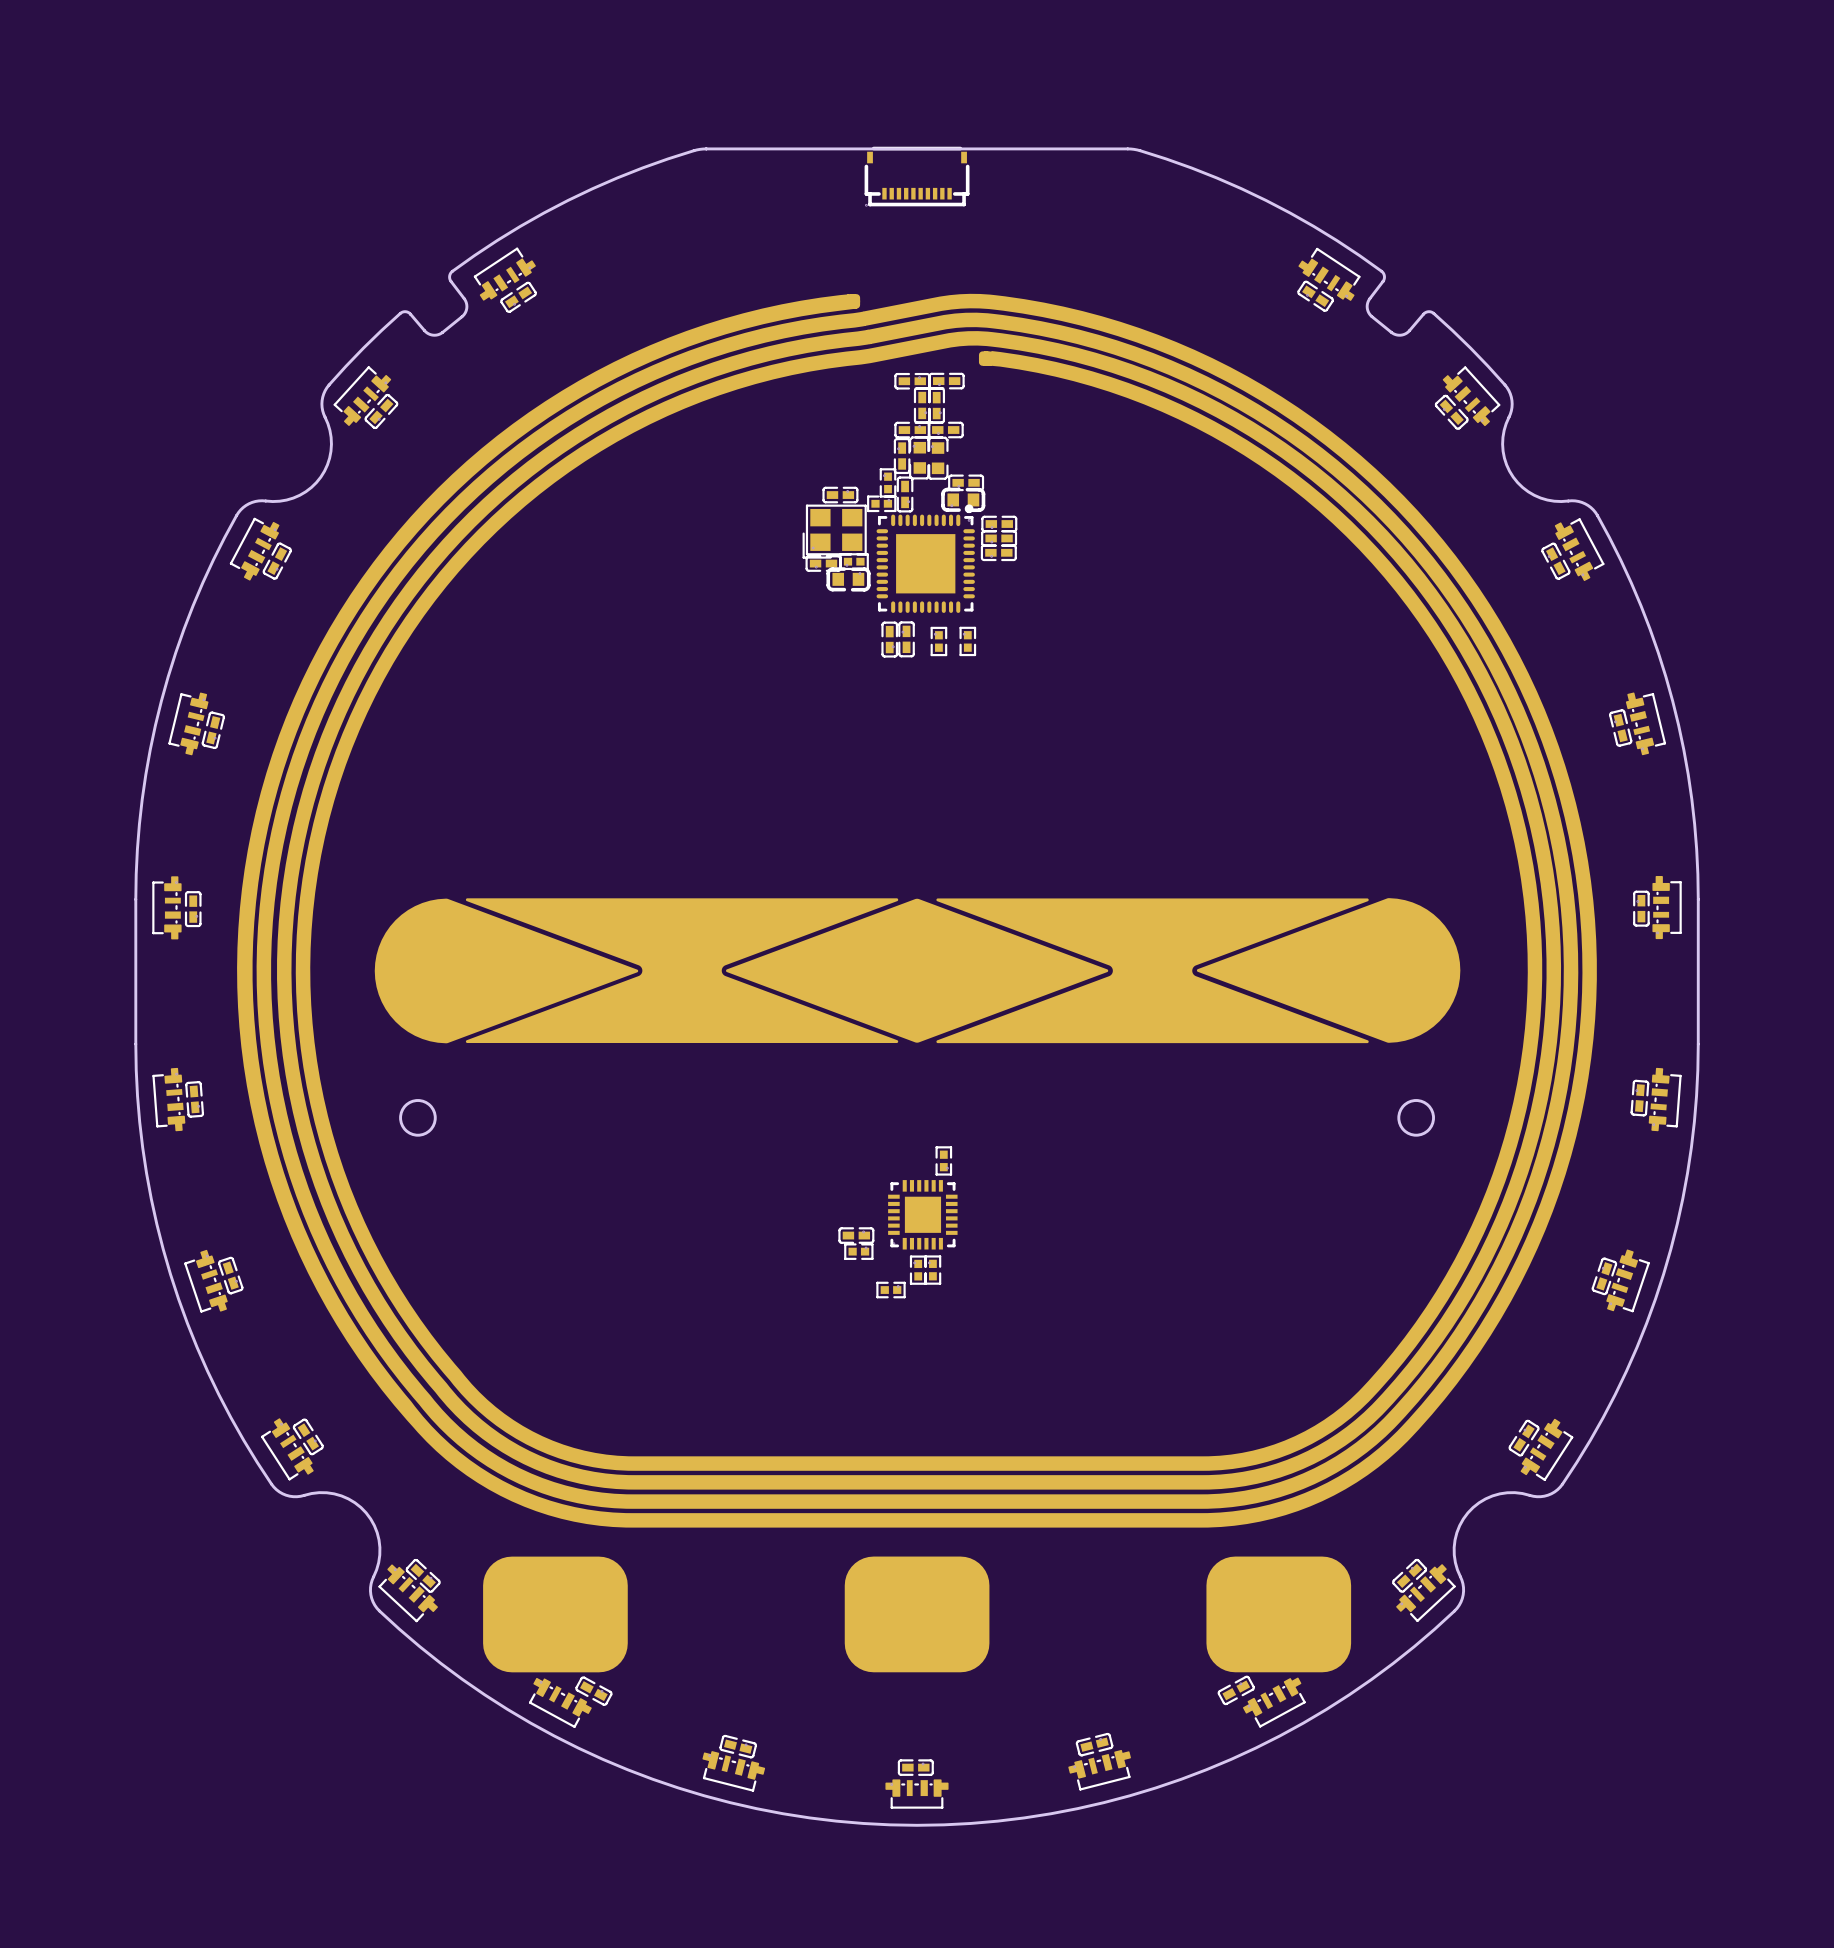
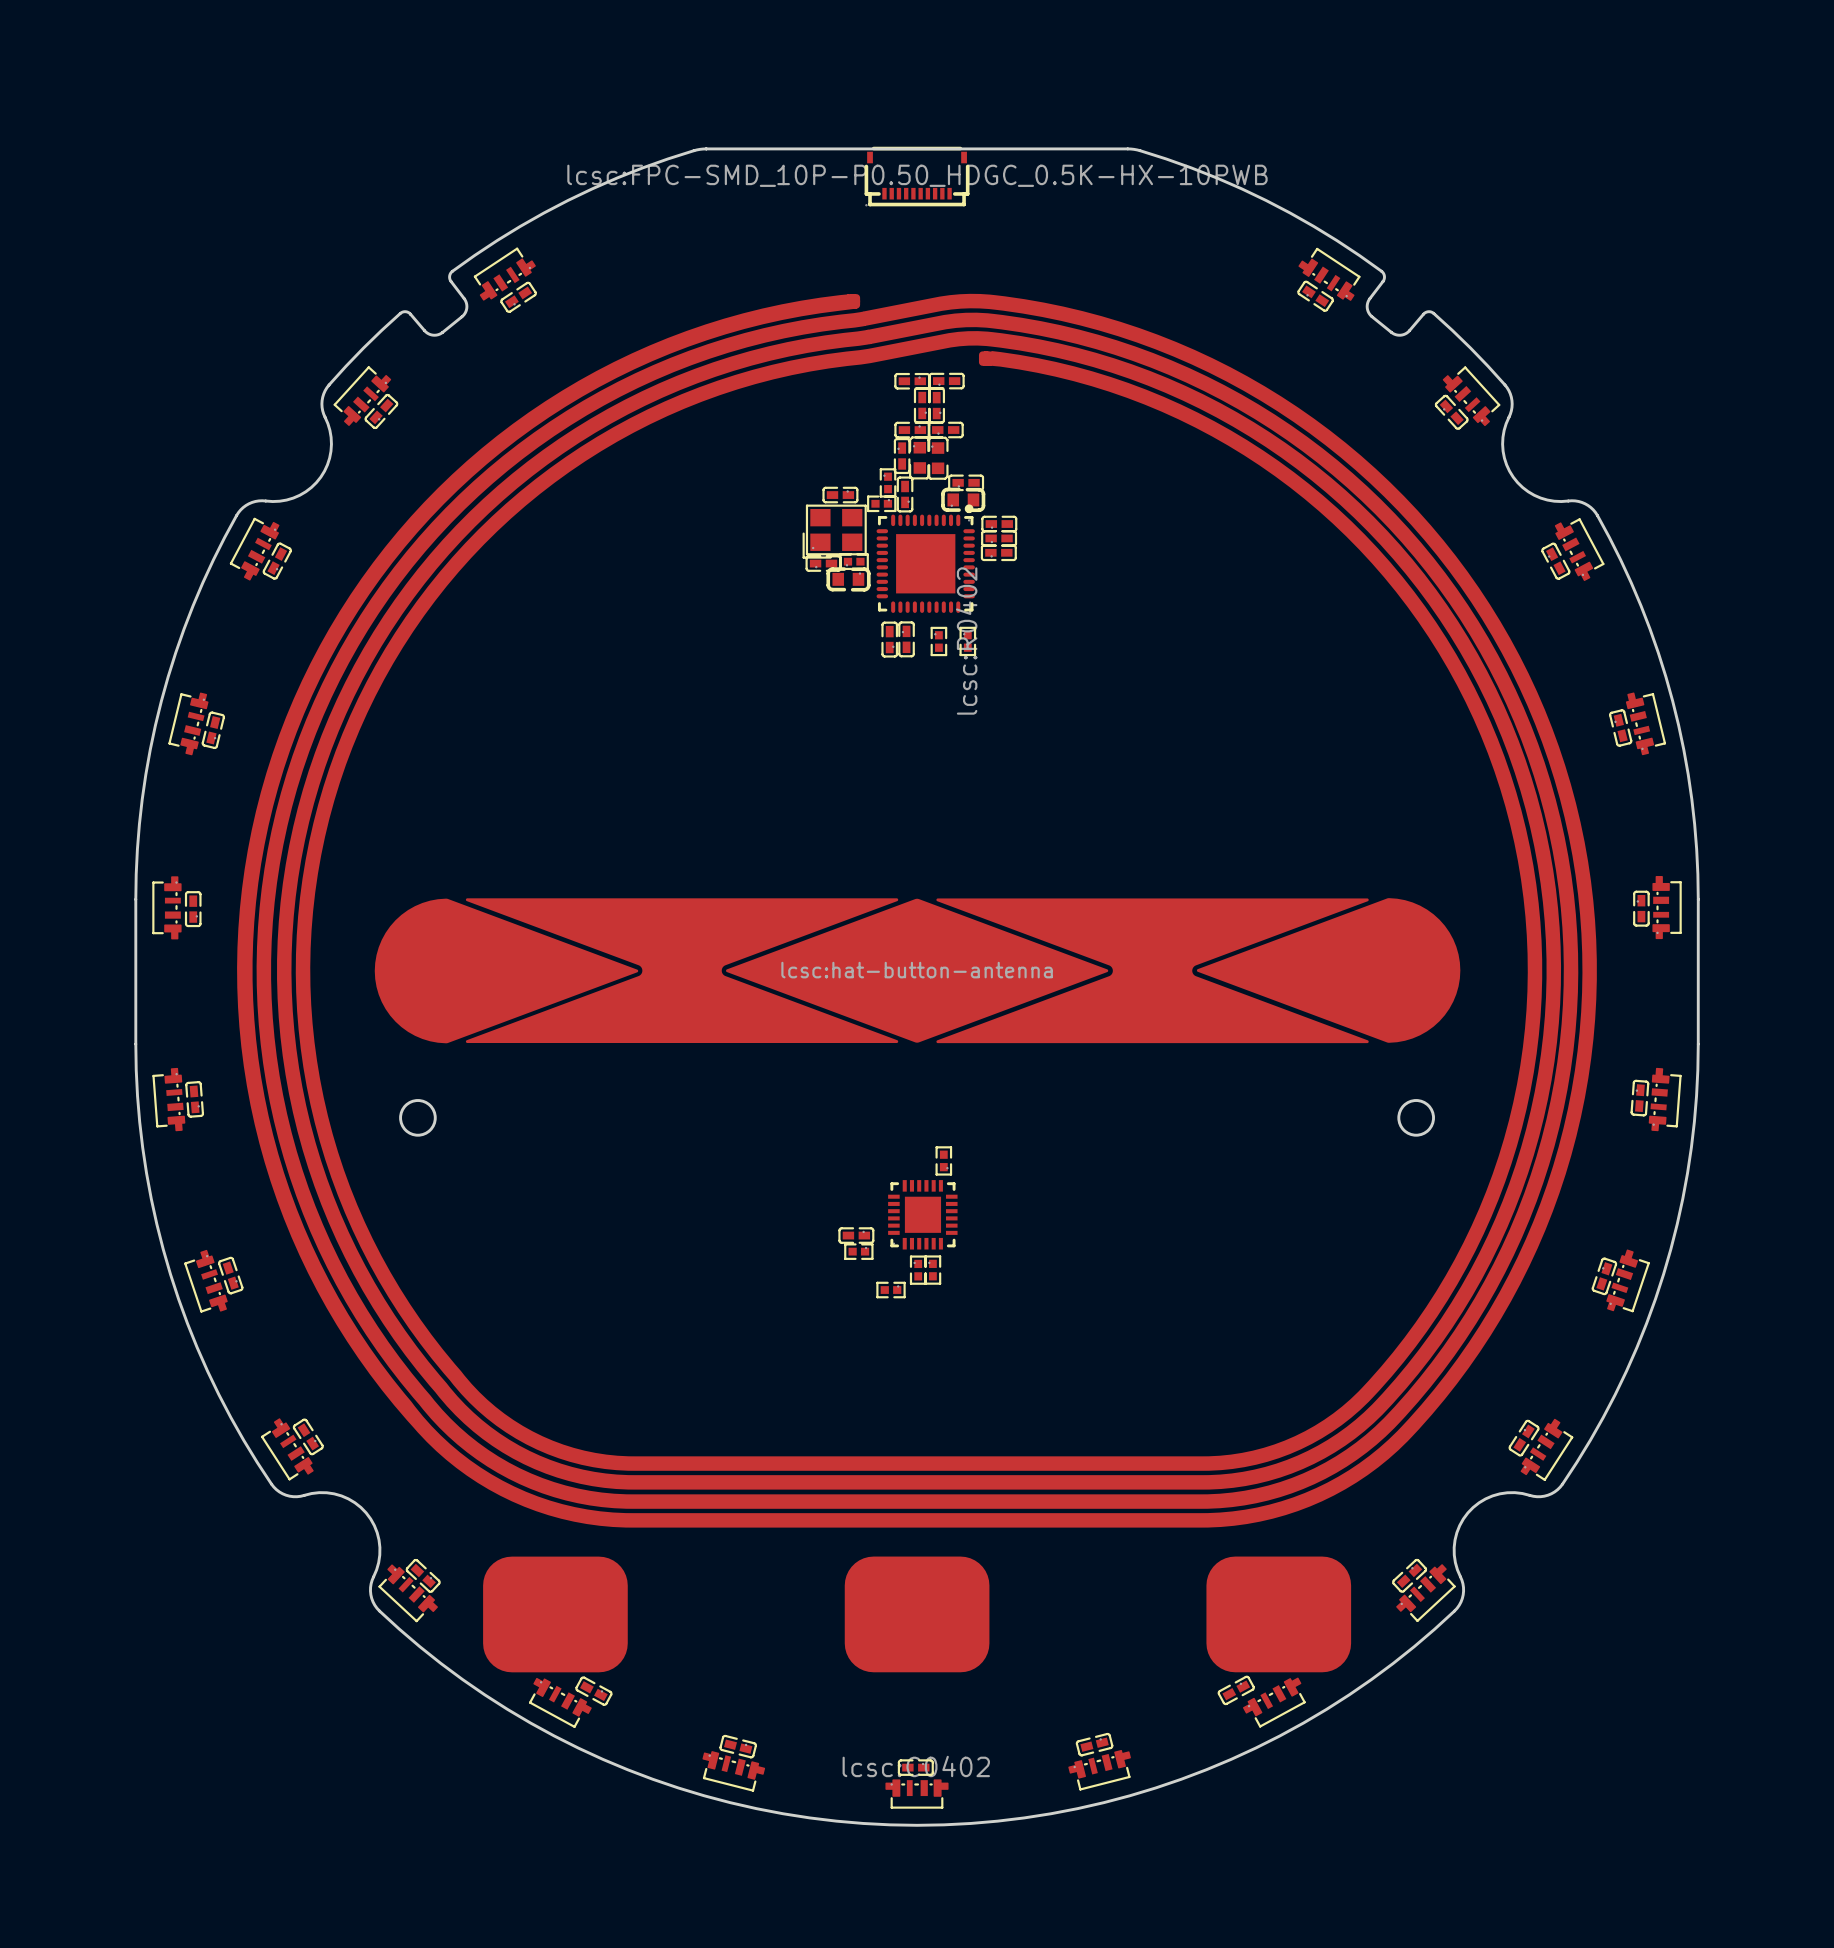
part text: none -> lcsc:FPC-SMD_10P-P0.50_HDGC_0.5K-HX-10PWB (917, 175)
part text: none -> lcsc:R0402 (966, 641)
part text: none -> lcsc:hat-button-antenna (917, 970)
part text: none -> lcsc:C0402 (916, 1766)

